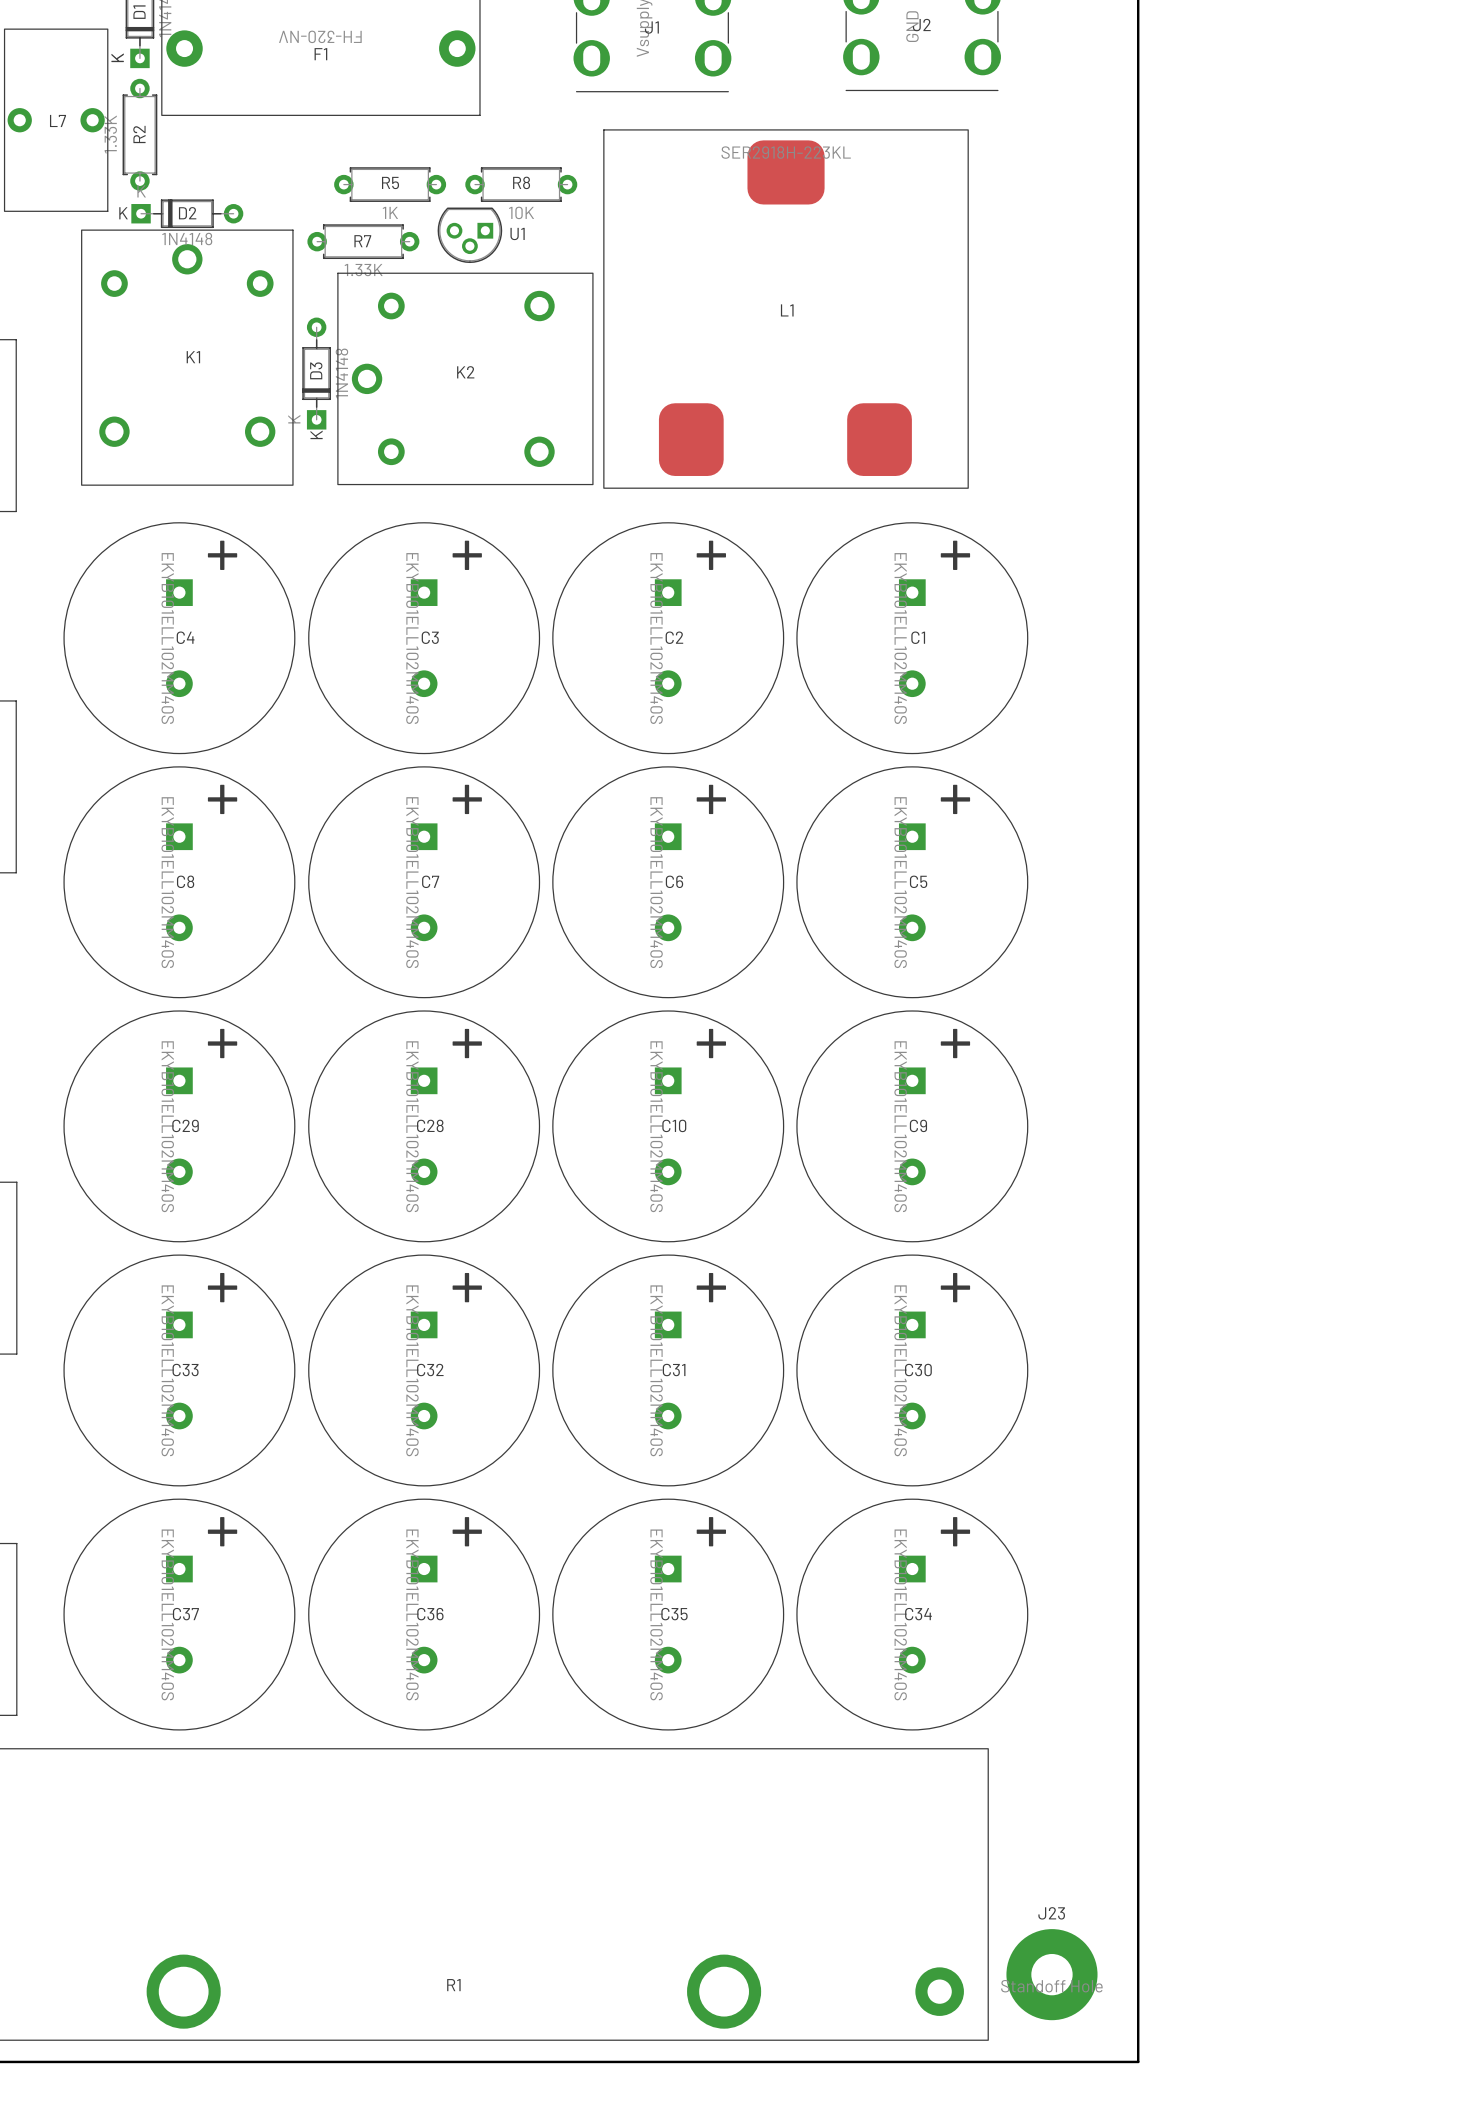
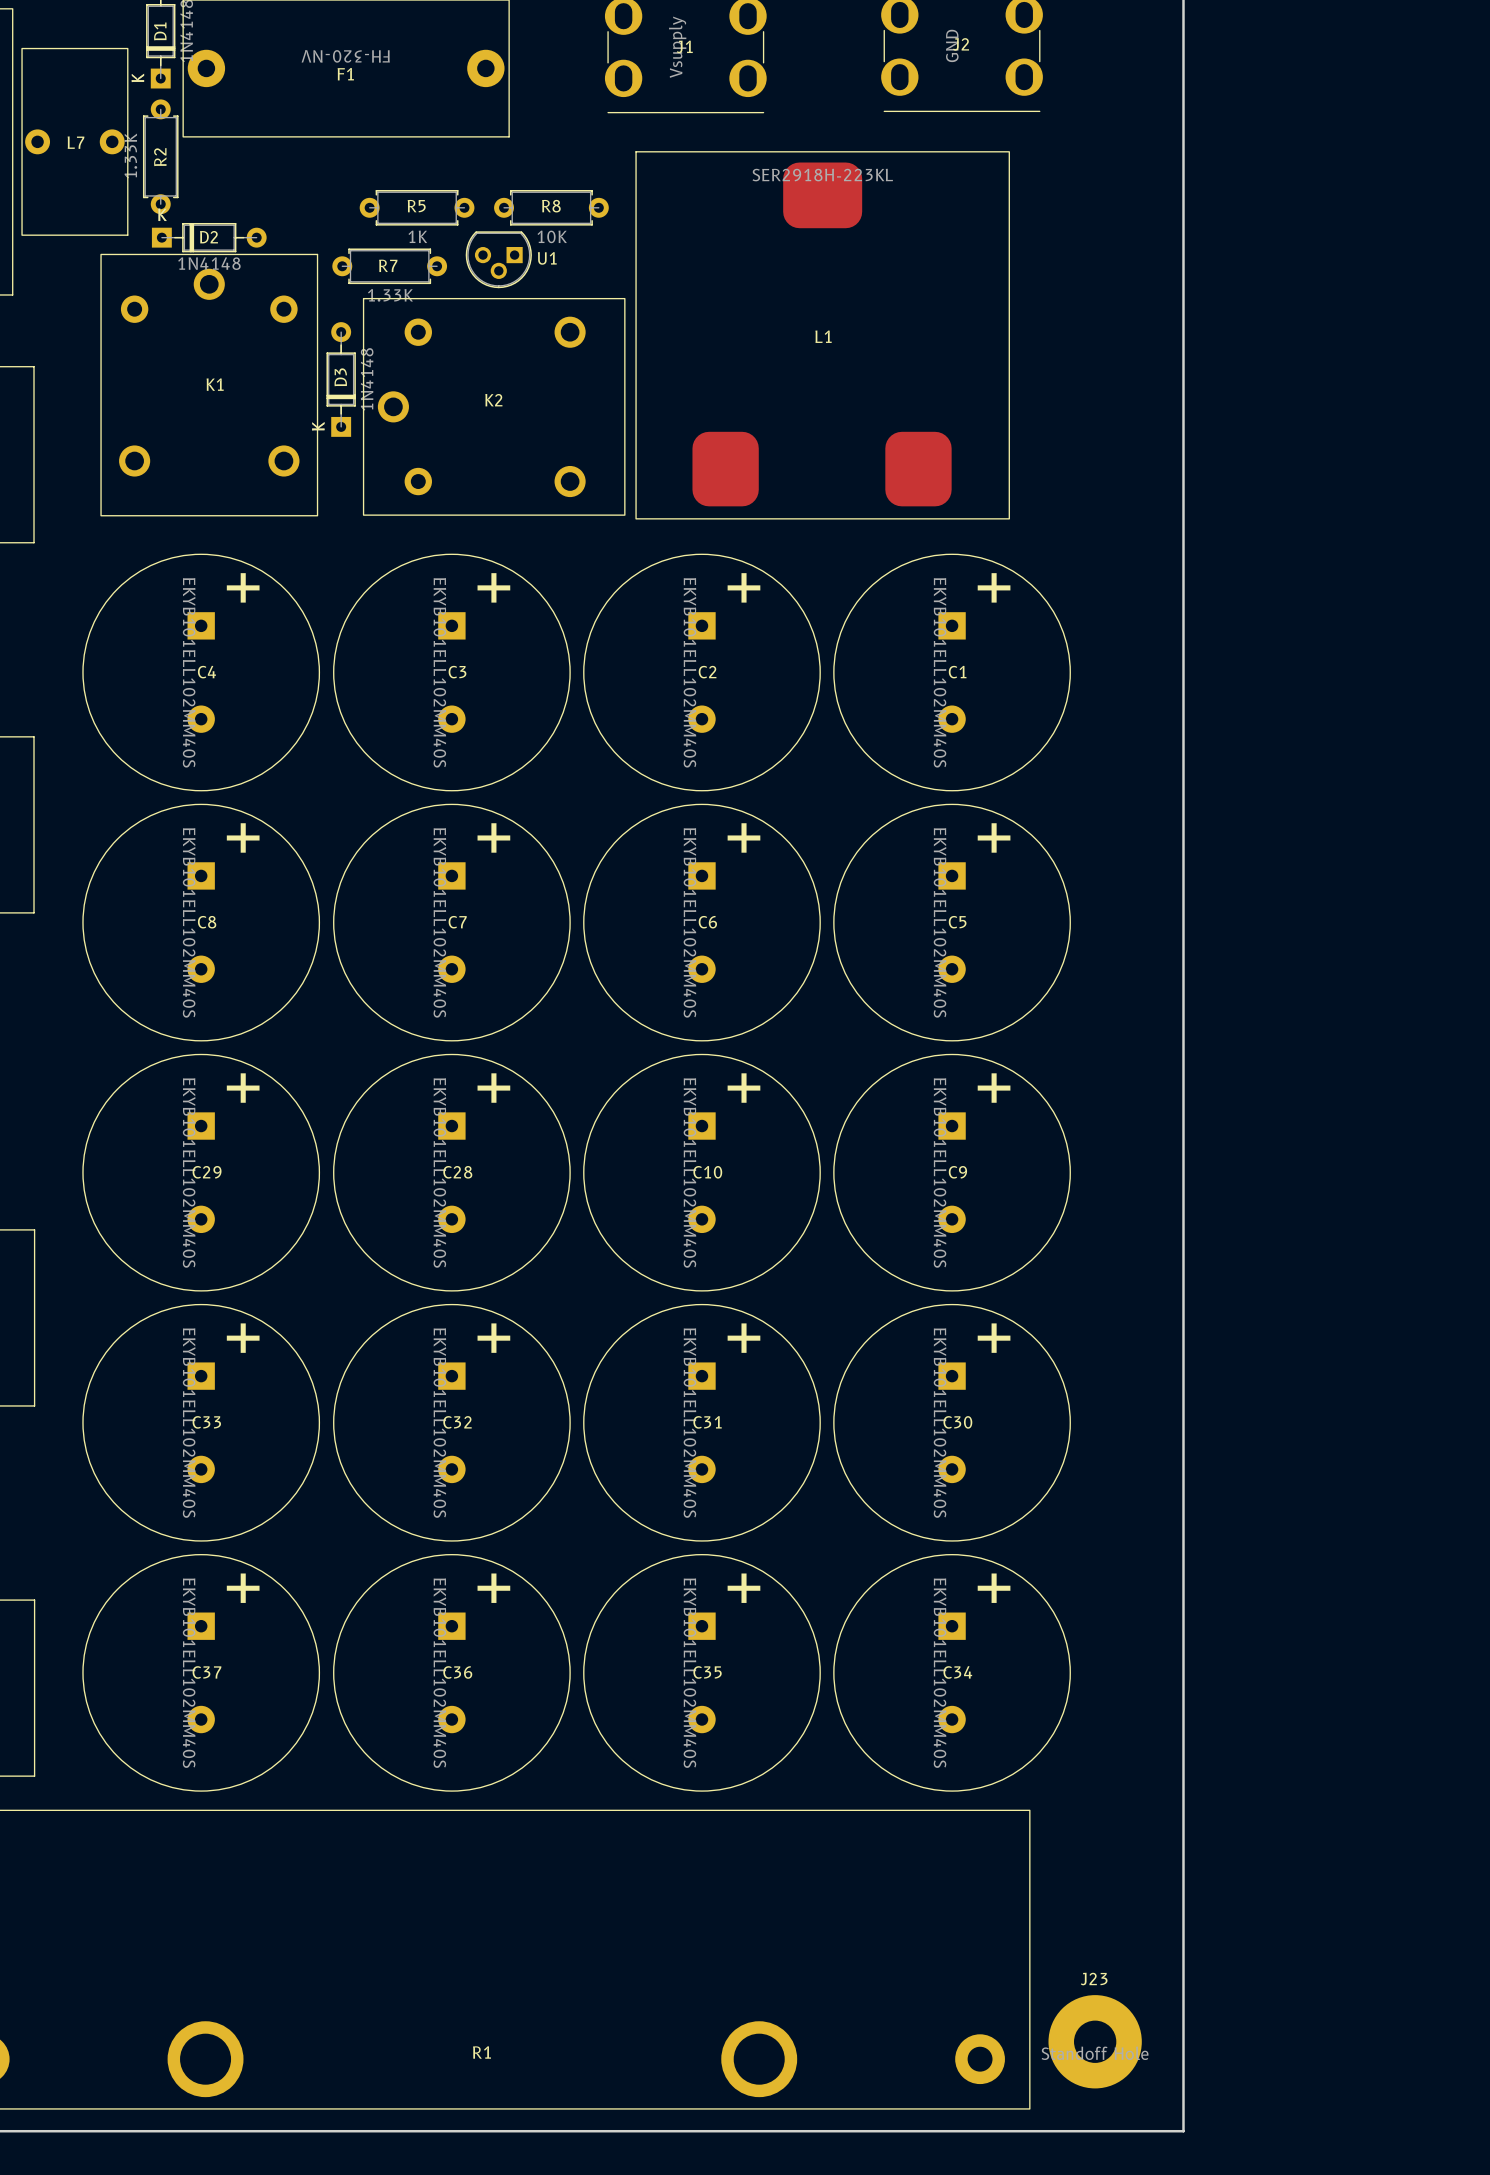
D2 footprint: [131, 199, 244, 229] -> [151, 222, 267, 253]
D3 footprint: [302, 317, 331, 430] -> [326, 322, 356, 437]

